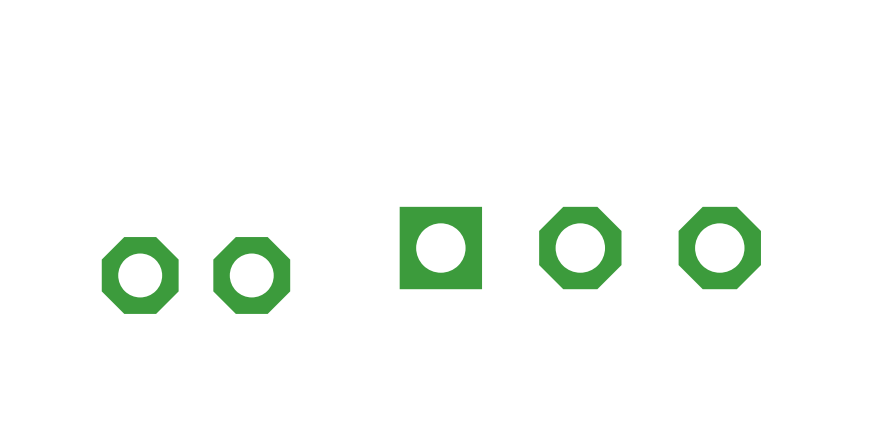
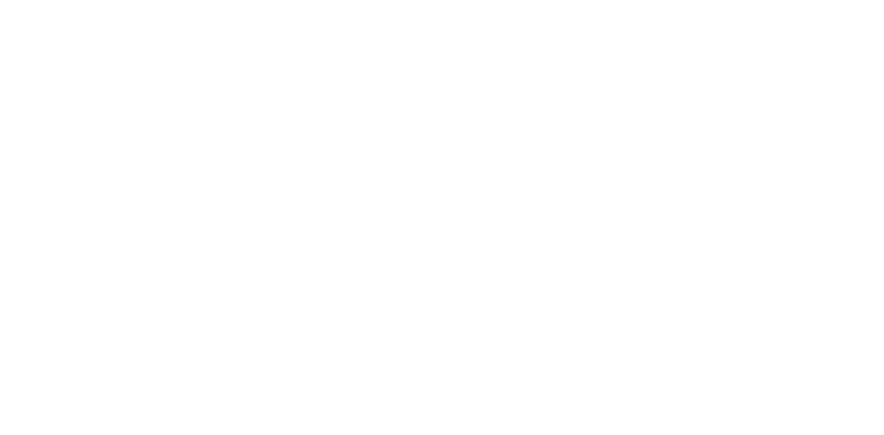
part: (580, 248) -> none
part: (195, 275) -> none

